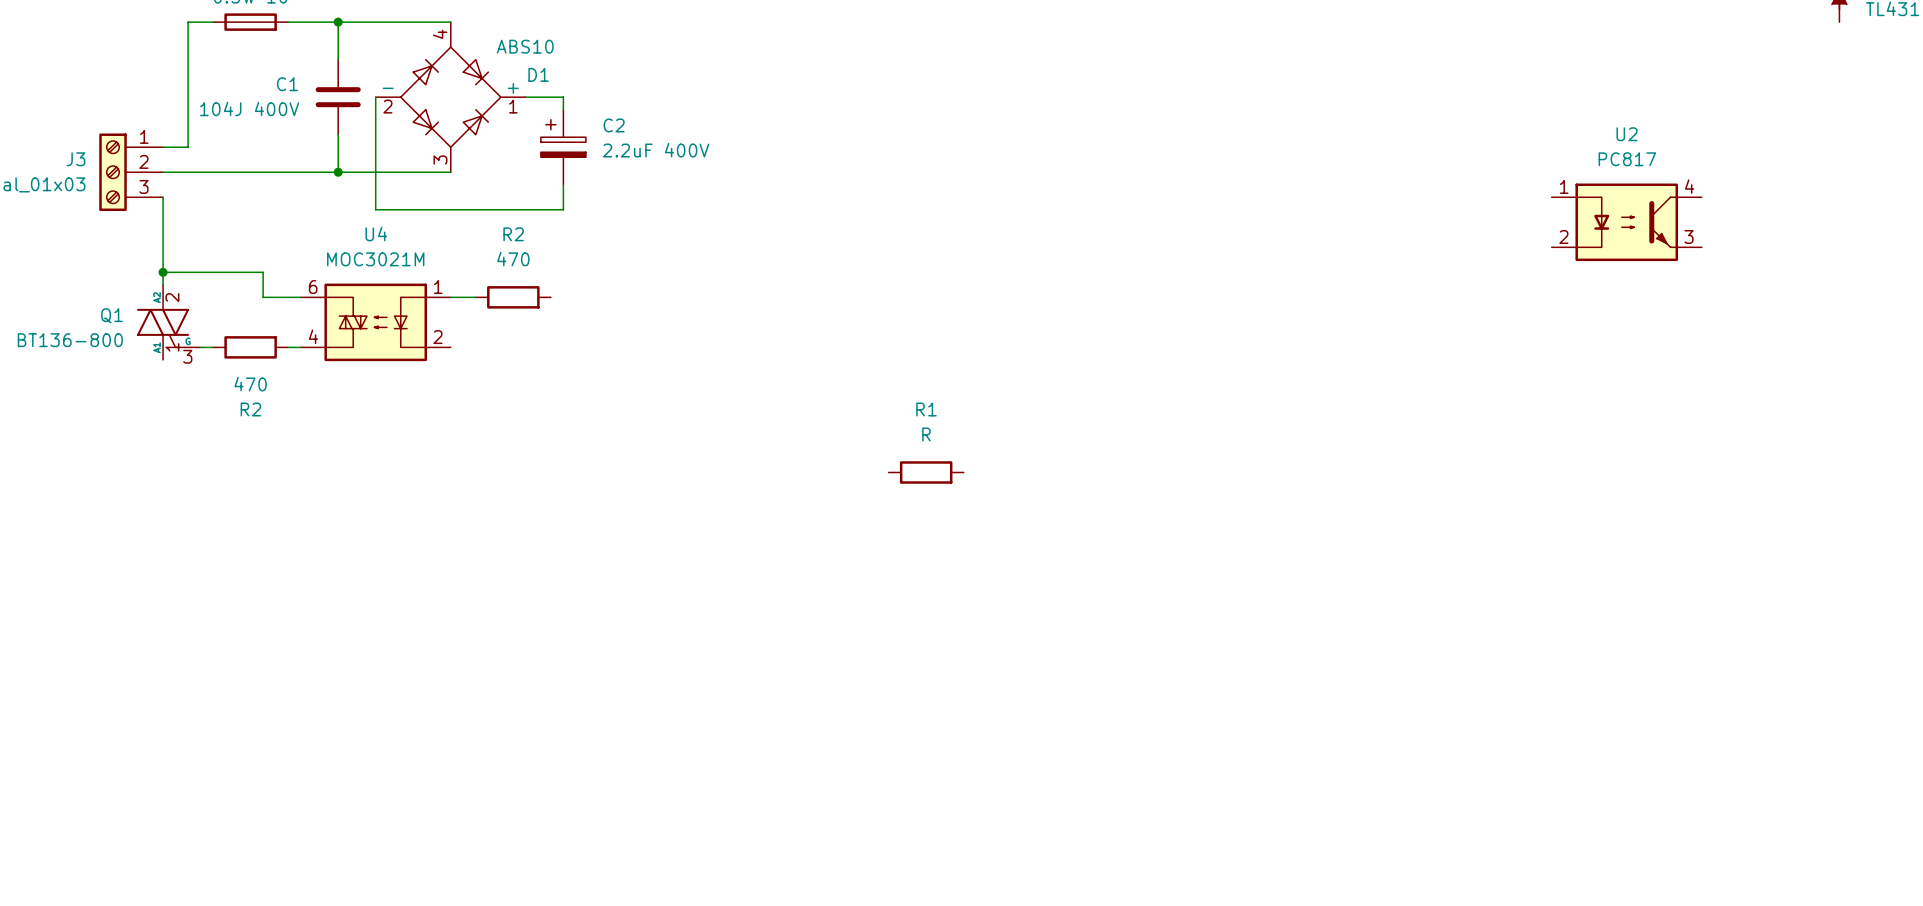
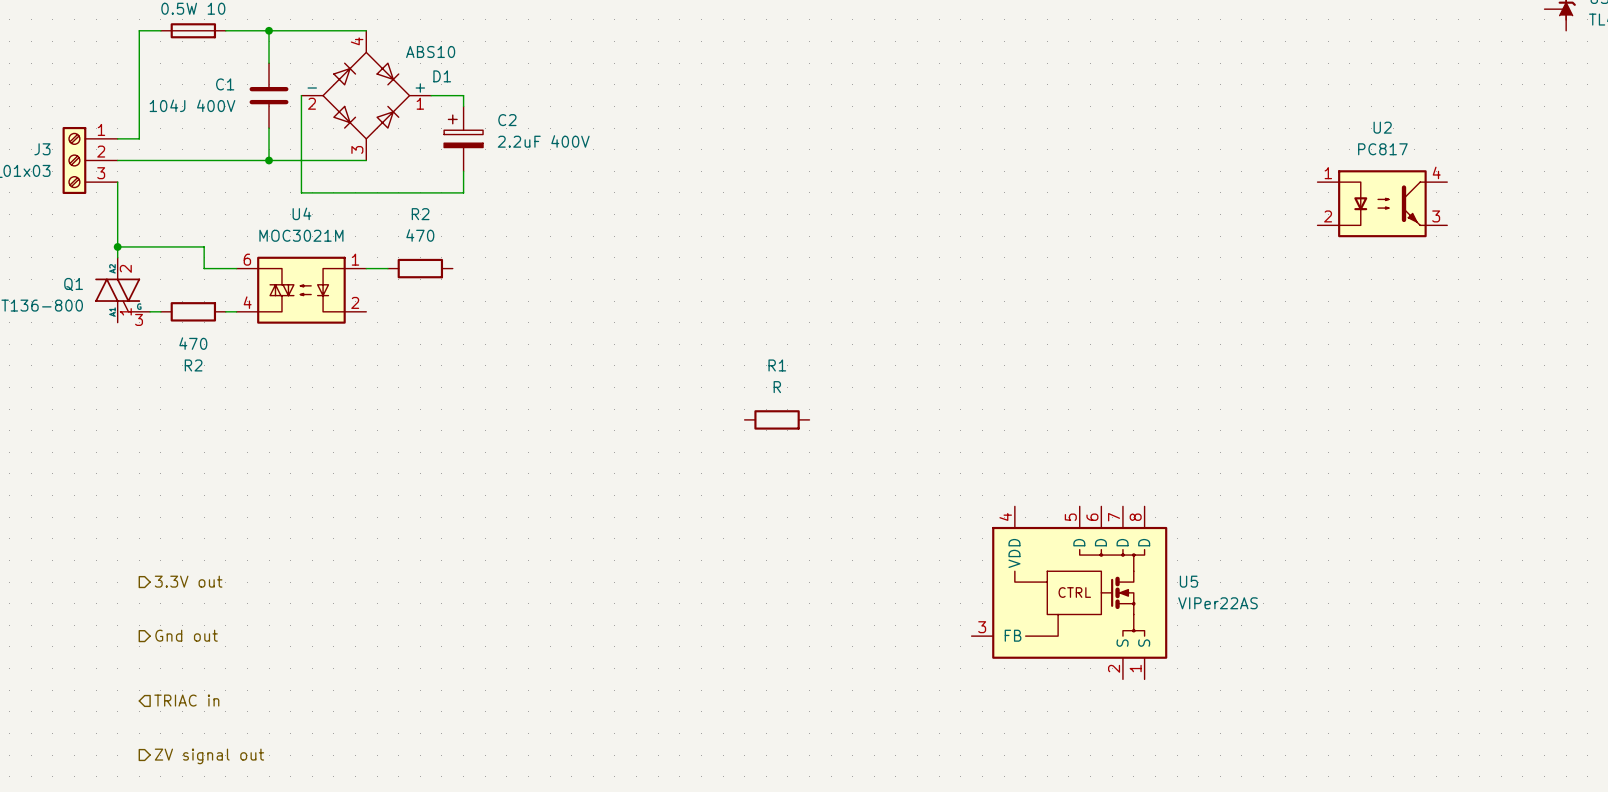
hierarchical label: none -> 3.3V out (188, 581)
U5: none -> VIPer22AS (1069, 592)
hierarchical label: none -> Gnd out (186, 635)
hierarchical label: none -> TRIAC in (186, 700)
hierarchical label: none -> ZV signal out (209, 756)

